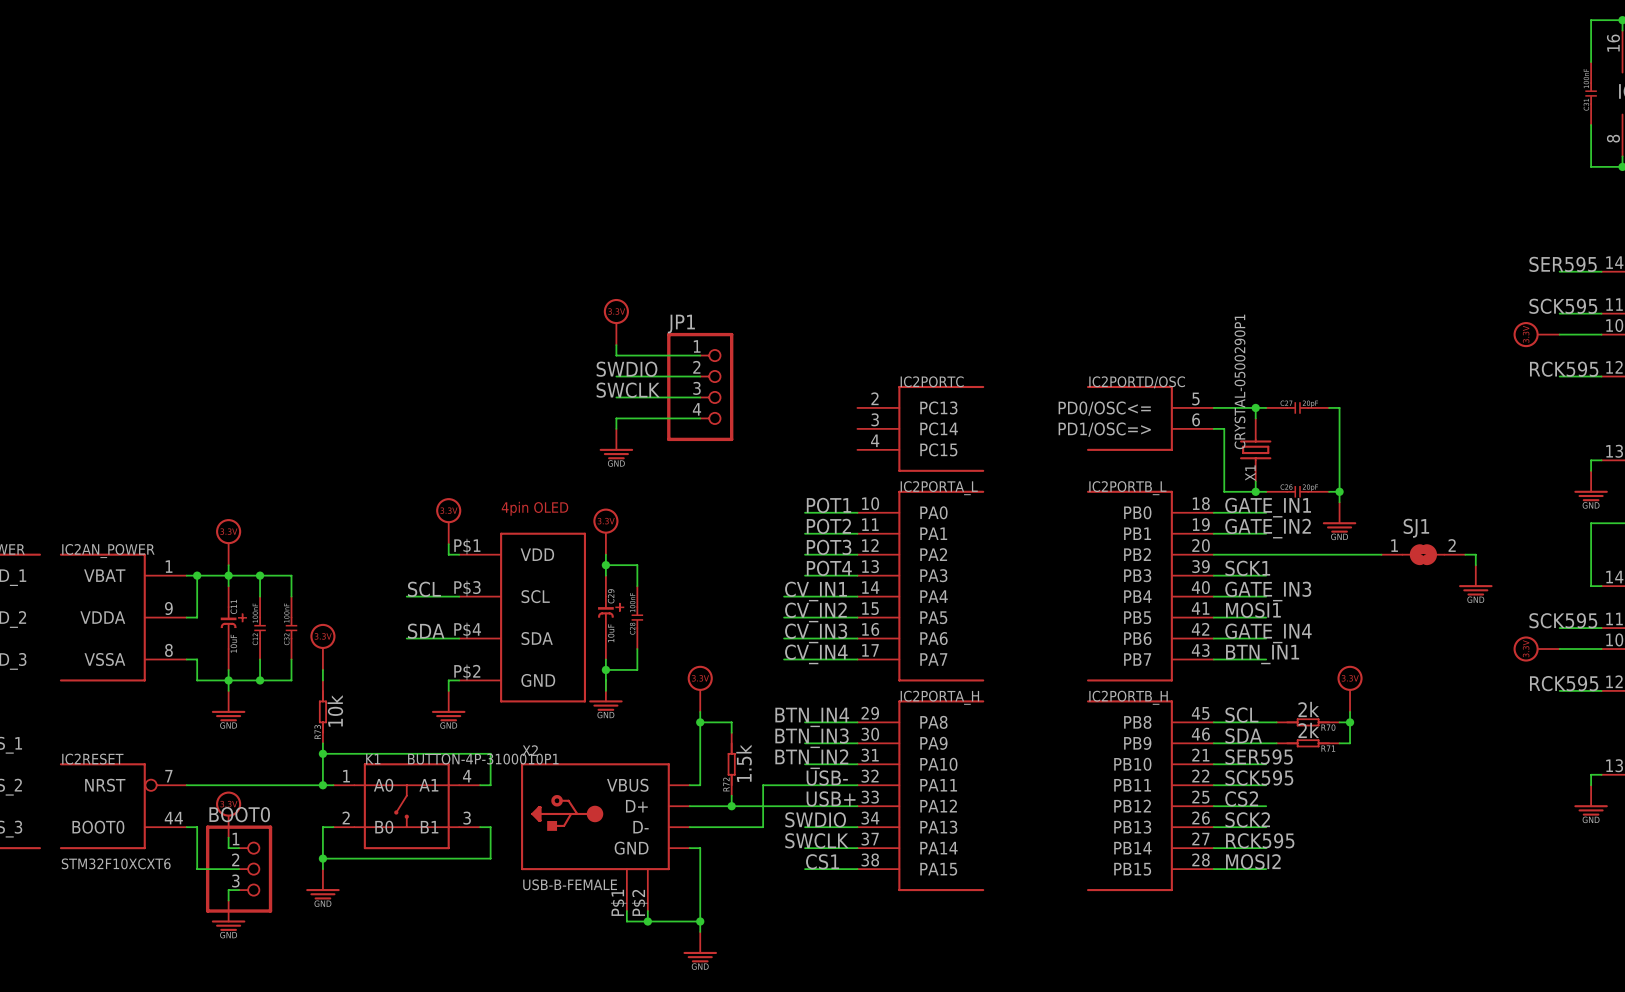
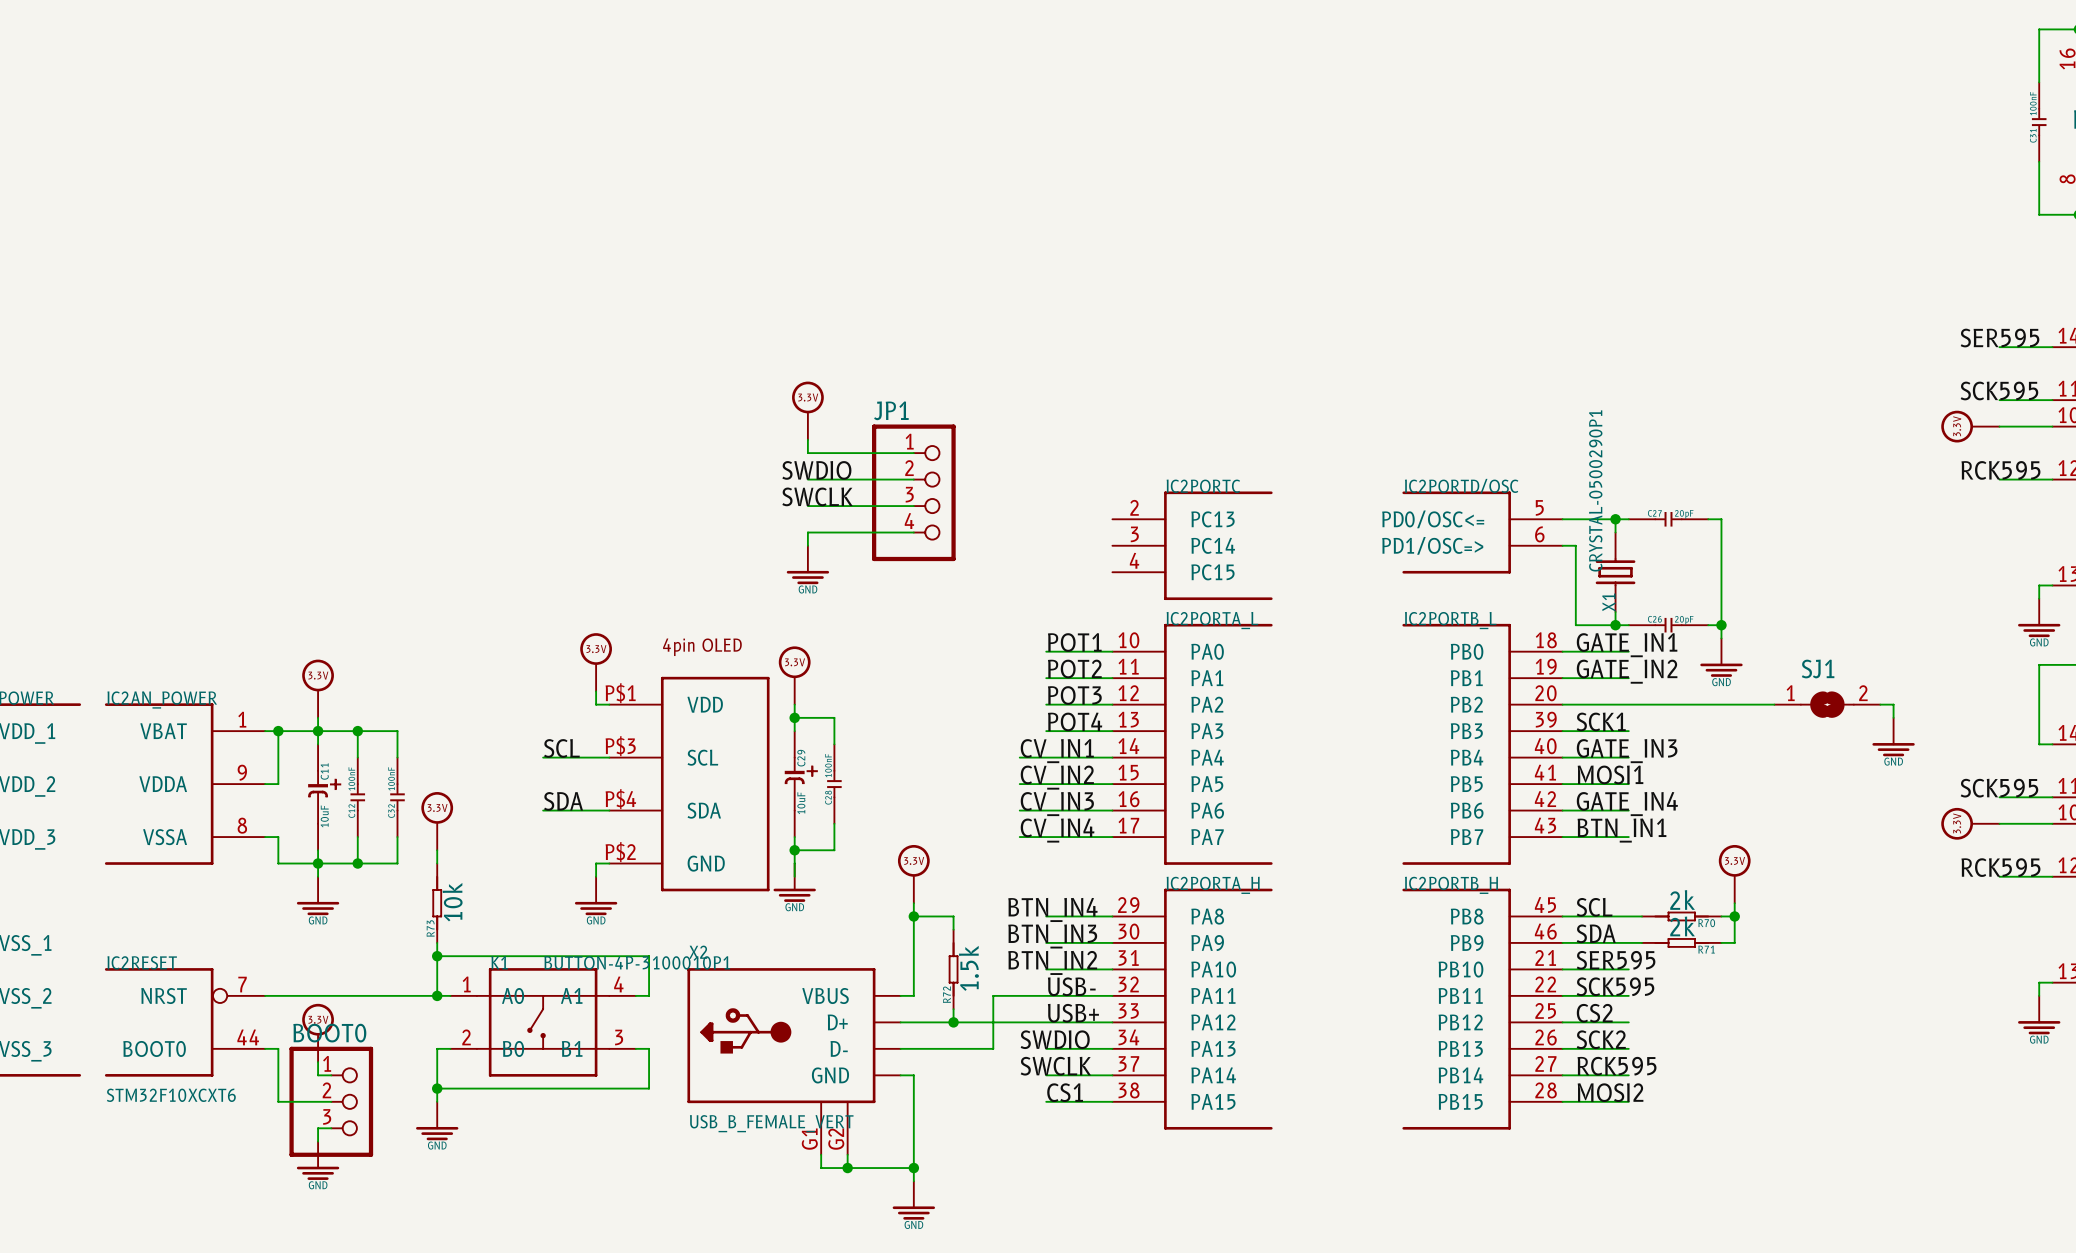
X2 value: USB-B-FEMALE (570, 884) -> USB_B_FEMALE_VERT (771, 1123)
X2 pin number: P$1 (618, 902) -> G1 (809, 1139)
X2 pin number: P$2 (639, 902) -> G2 (836, 1139)

